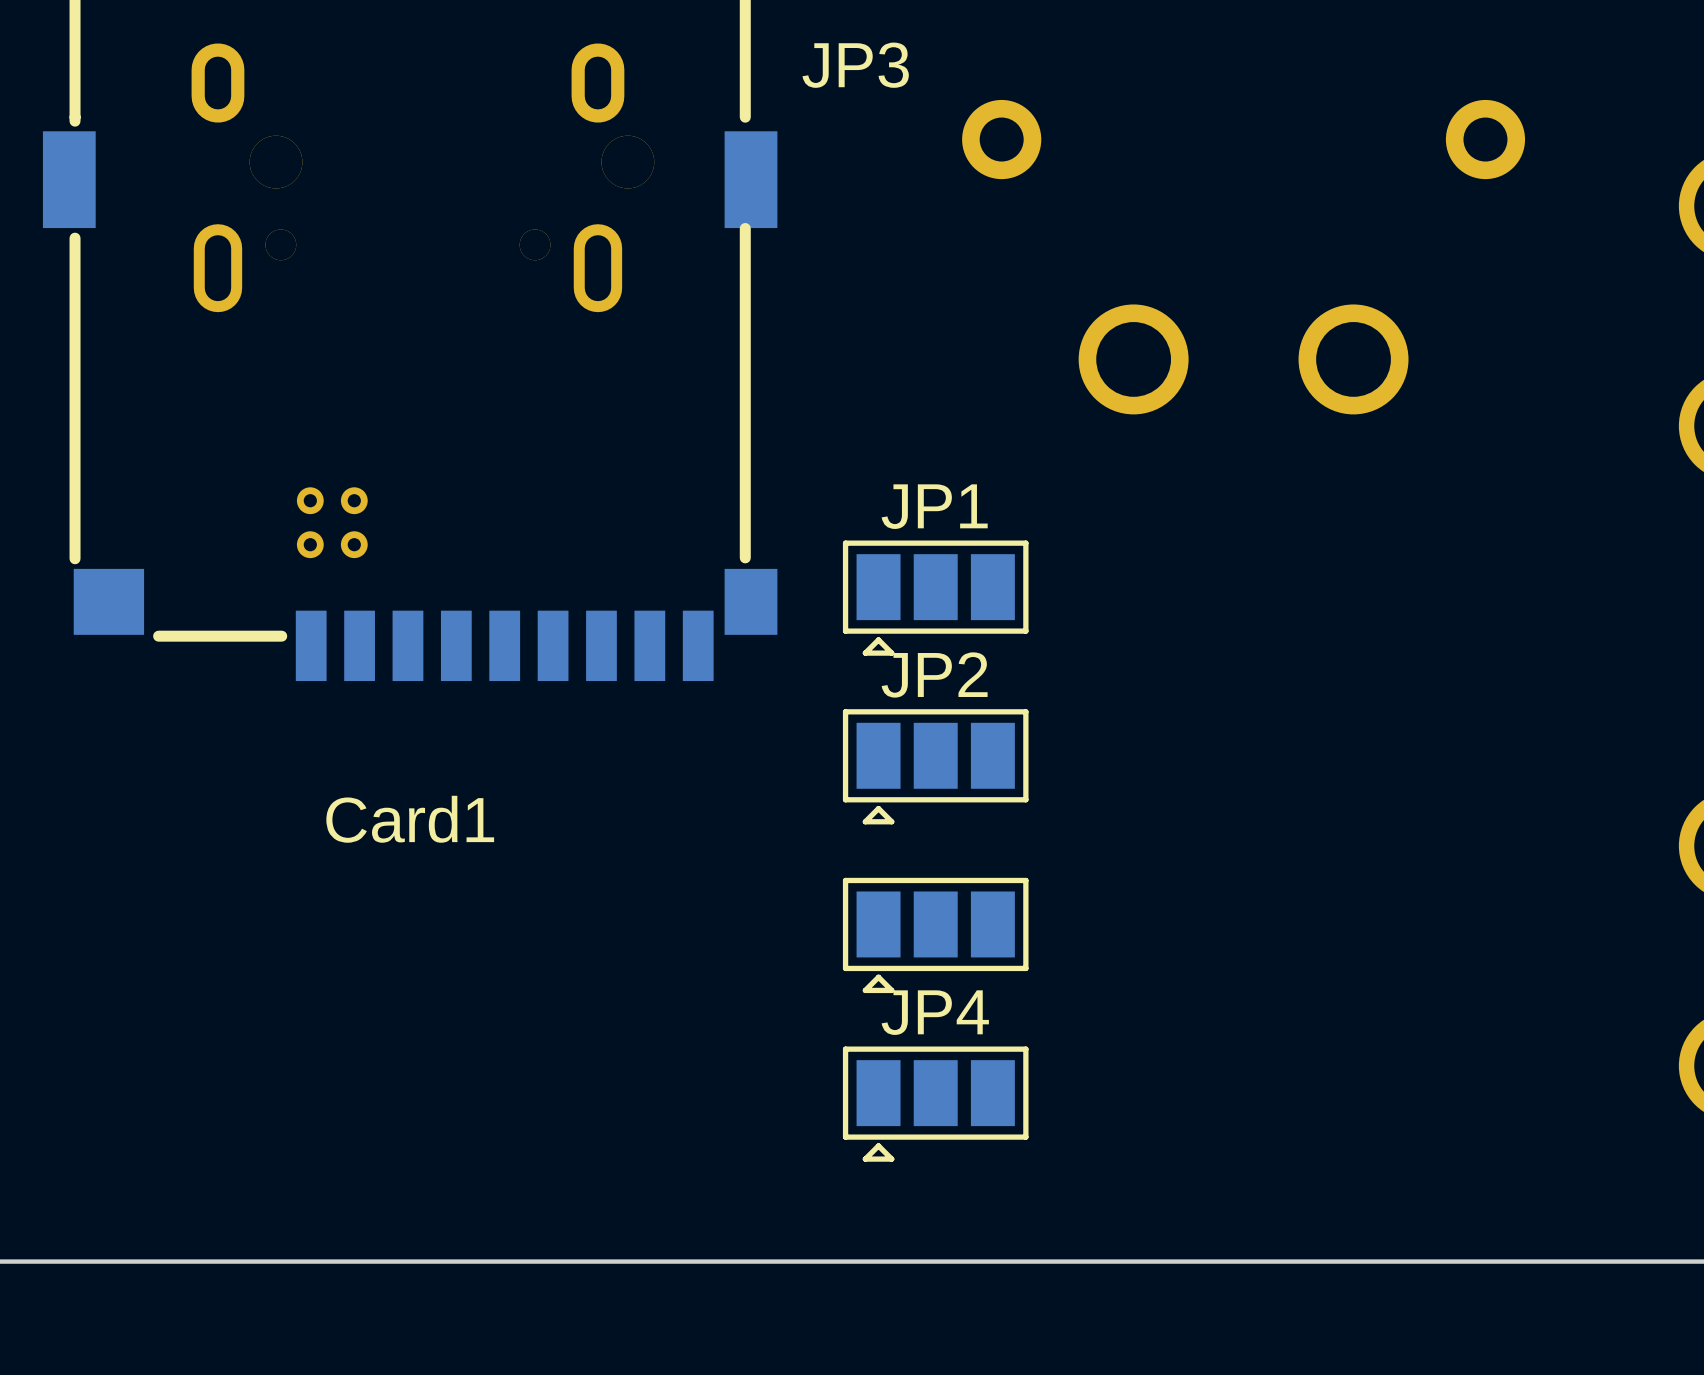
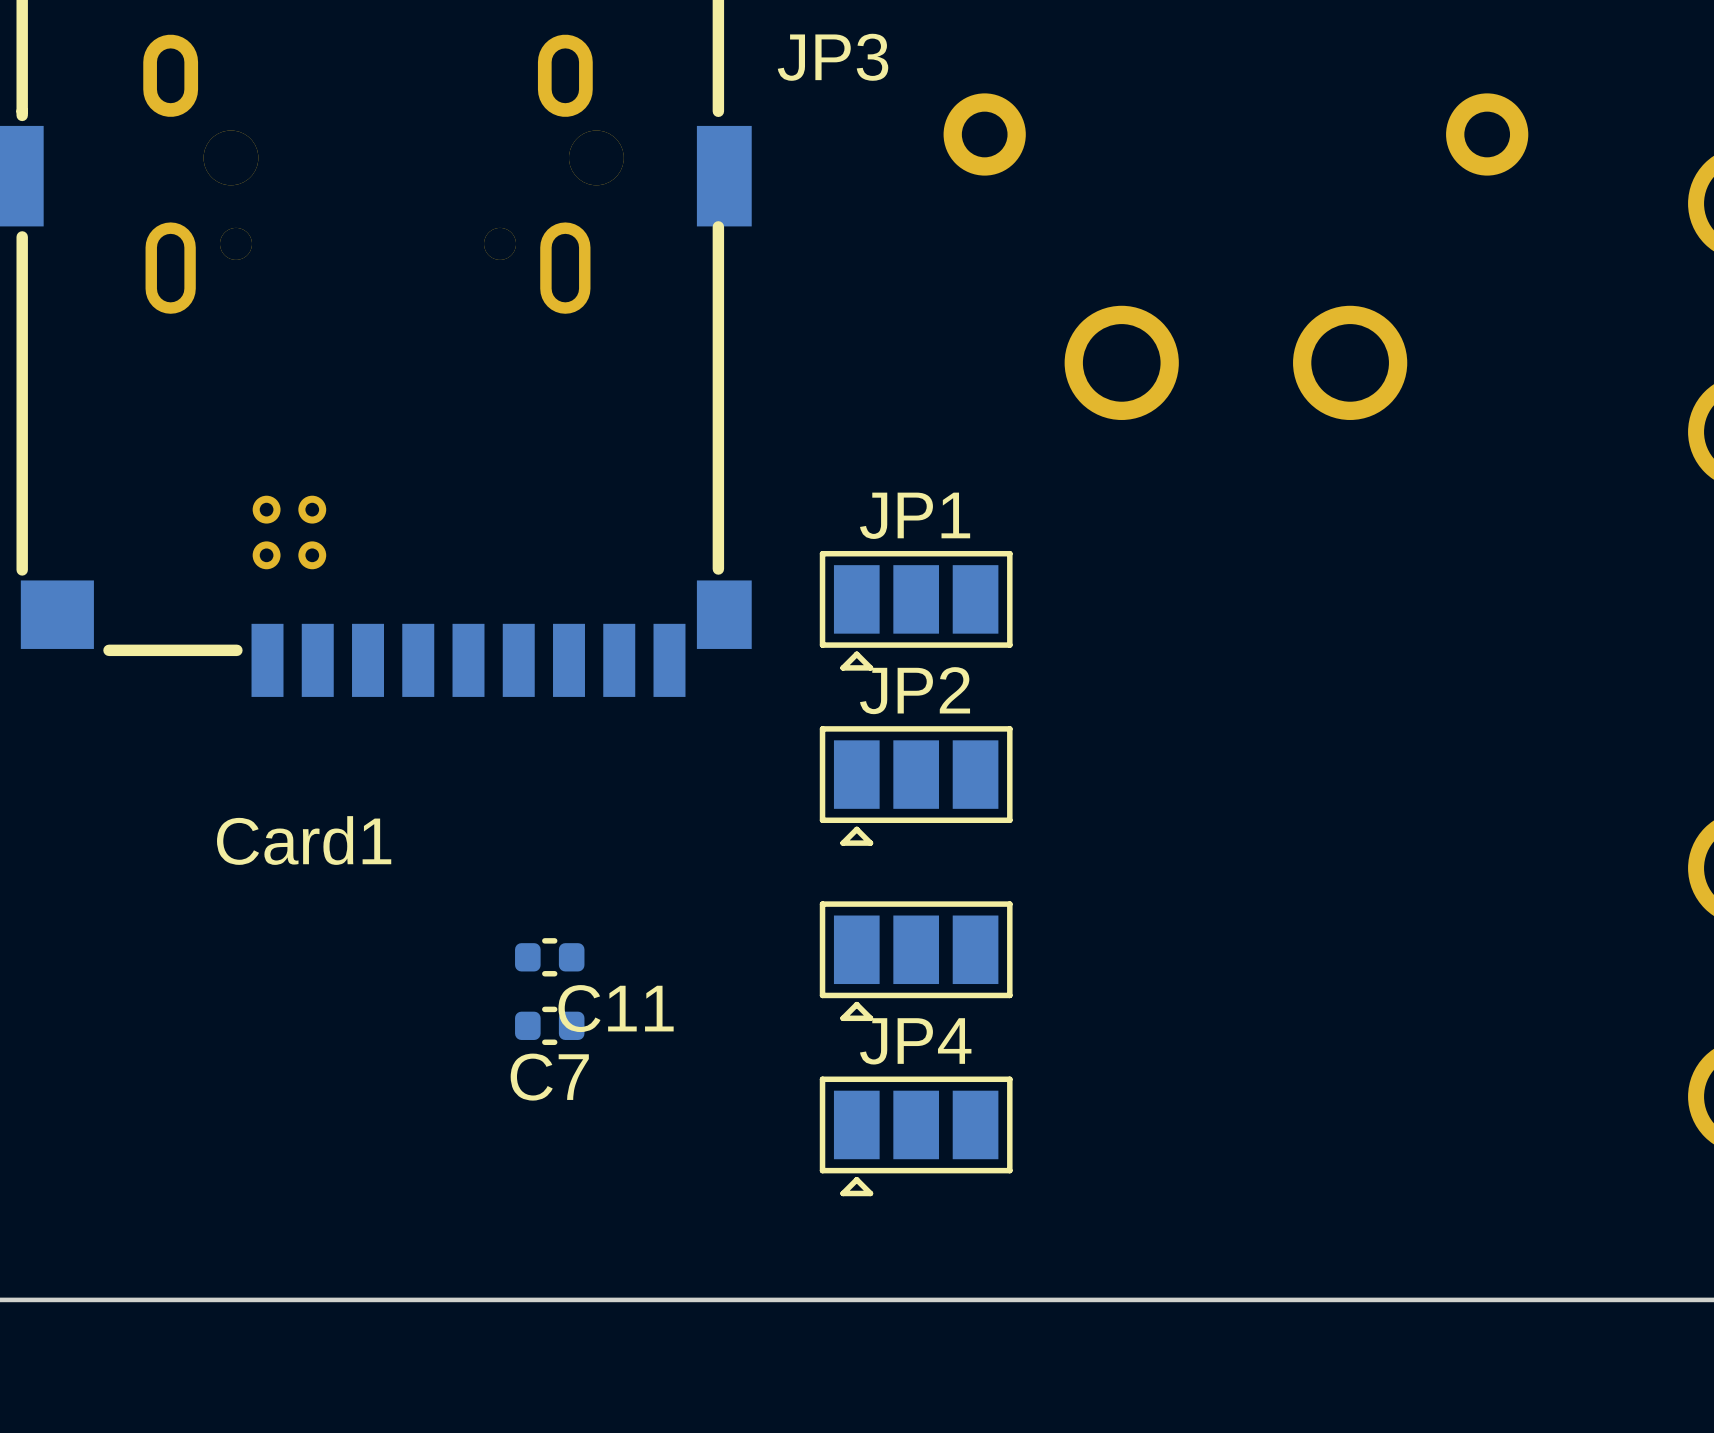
Card1 name position: Card1 (410, 819) -> Card1 (304, 840)
C11: none -> (549, 957)
C7: none -> (549, 1025)

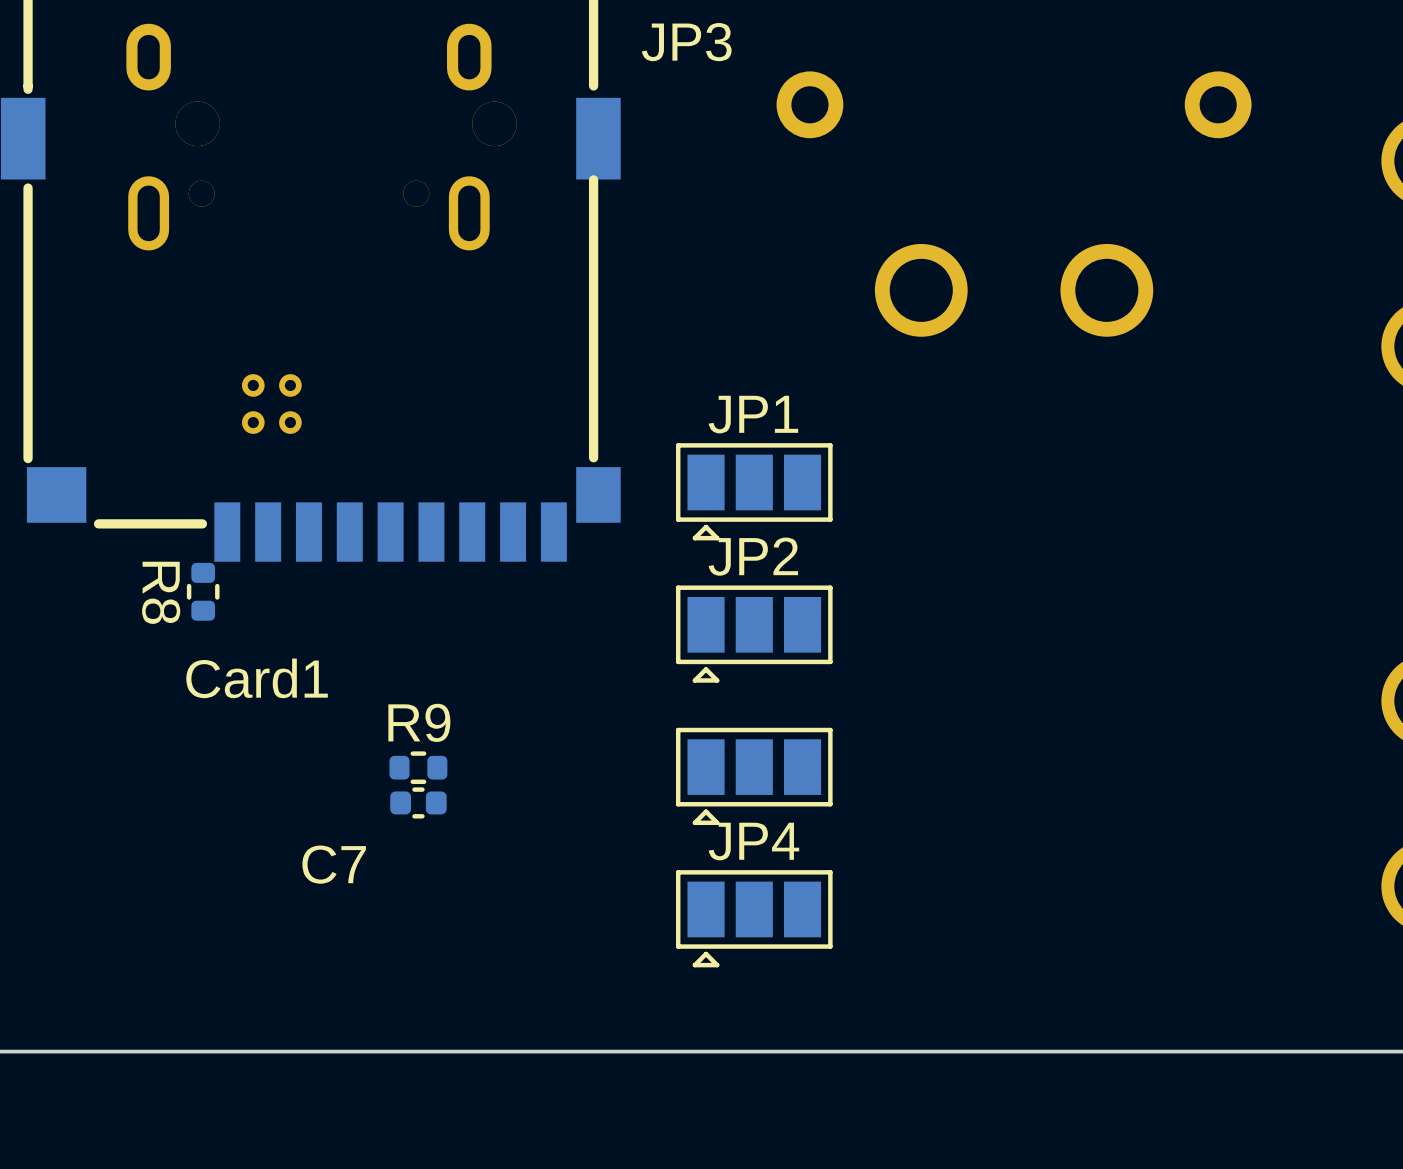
part position: (289, 532) -> (271, 404)
R8: none -> (203, 591)
R9: none -> (418, 767)
C11: (549, 957) -> none
C7 position: (549, 1025) -> (418, 802)
C7 name position: C7 (549, 1077) -> C7 (334, 864)

